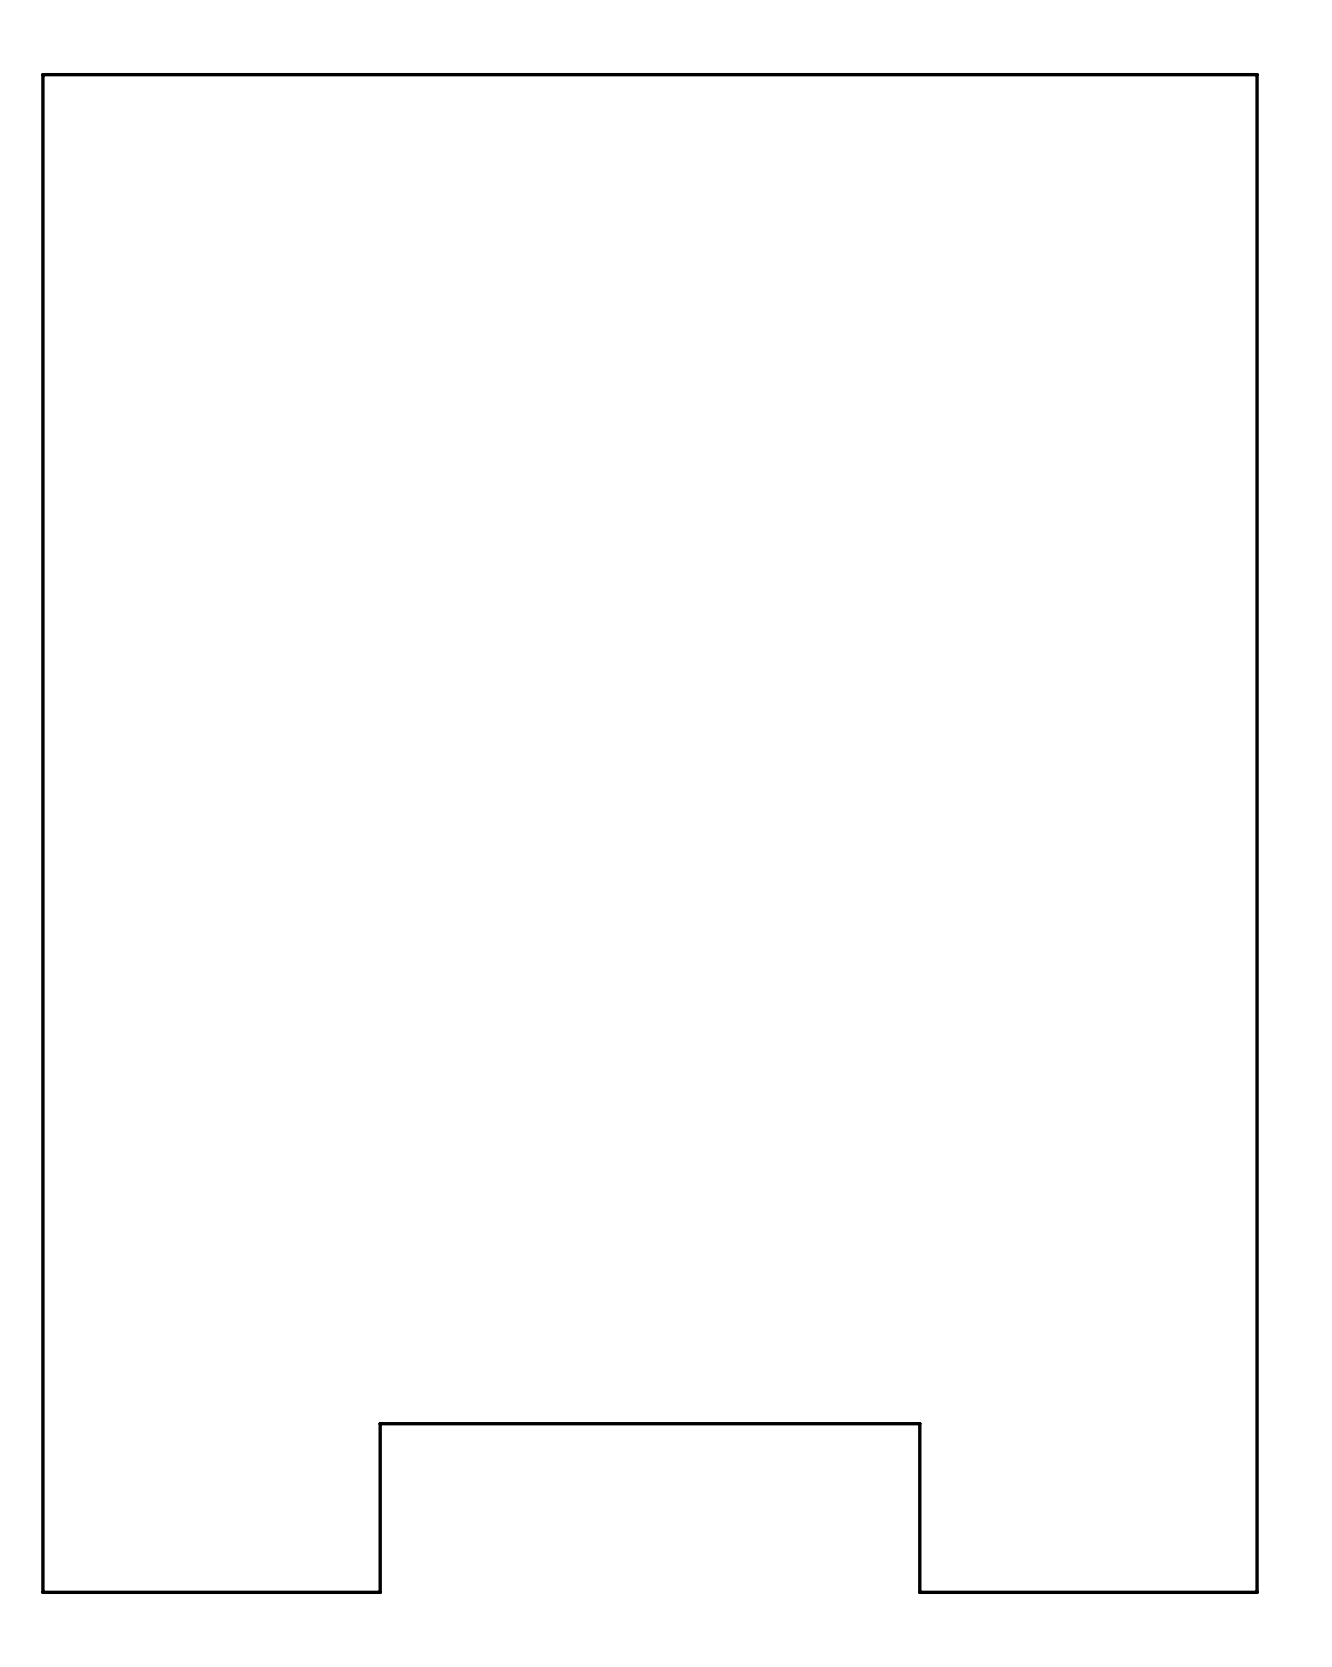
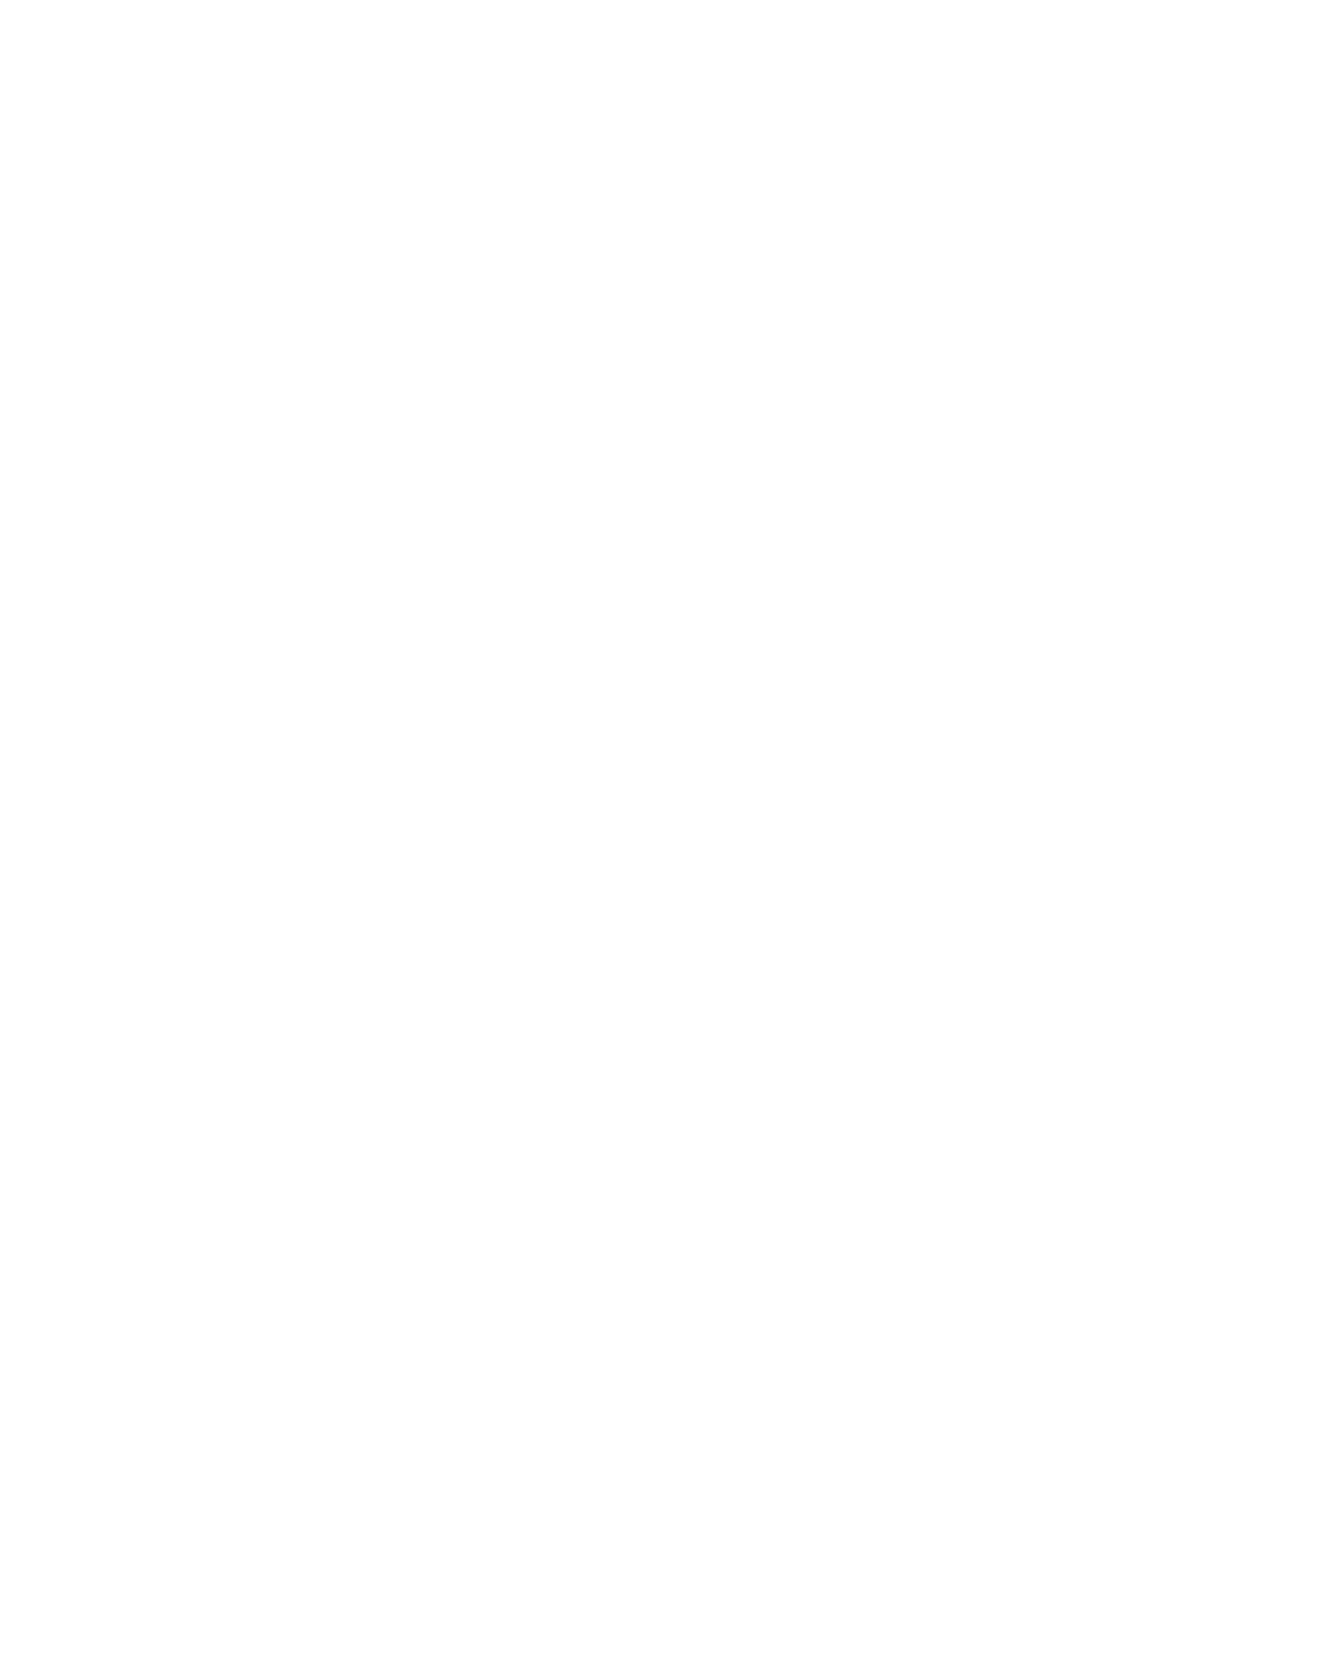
board edge: (42, 74) (1257, 74) (1257, 1592) (919, 1592) (919, 1423) (380, 1423) (380, 1592) (42, 1592) (42, 74) -> none

